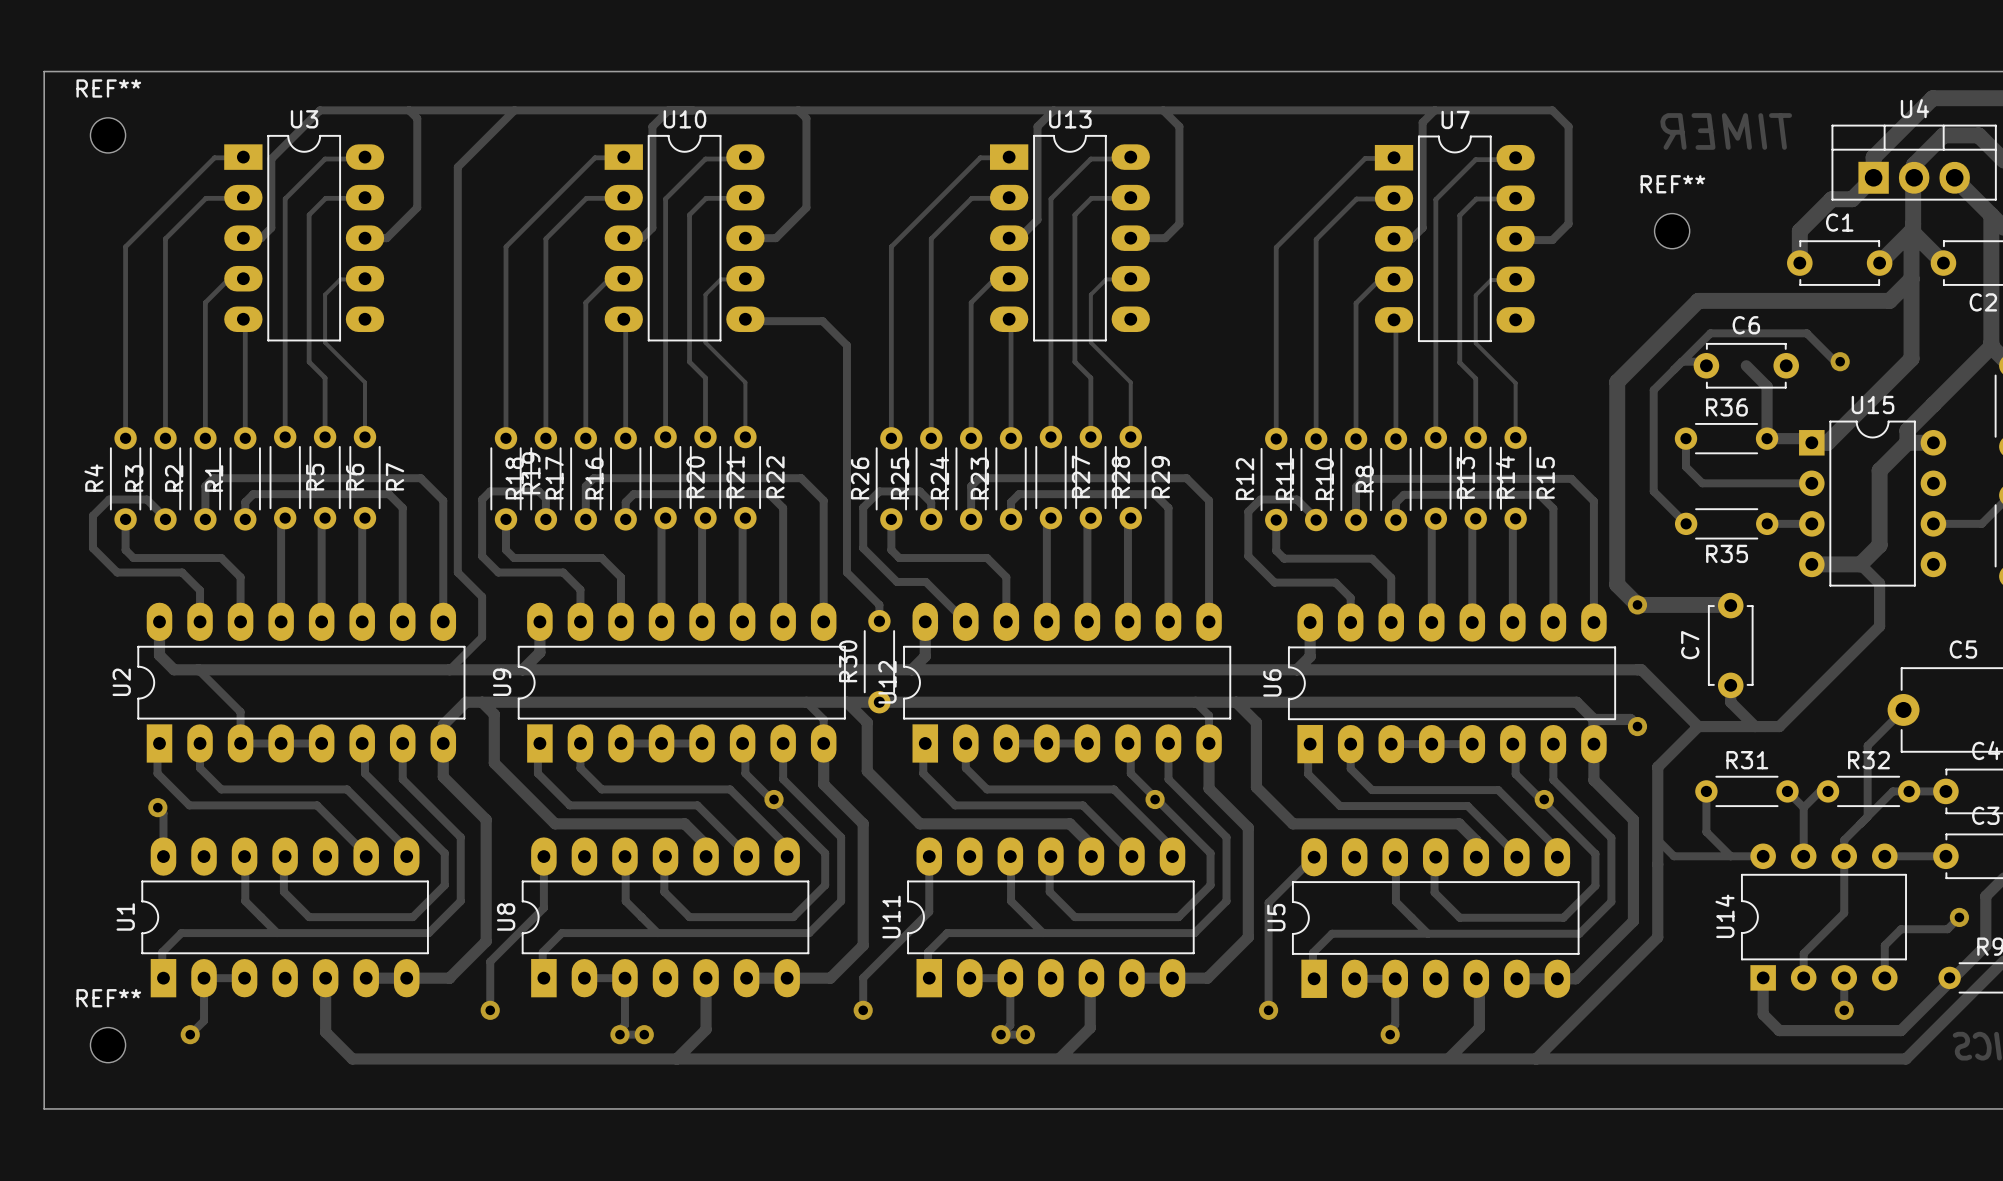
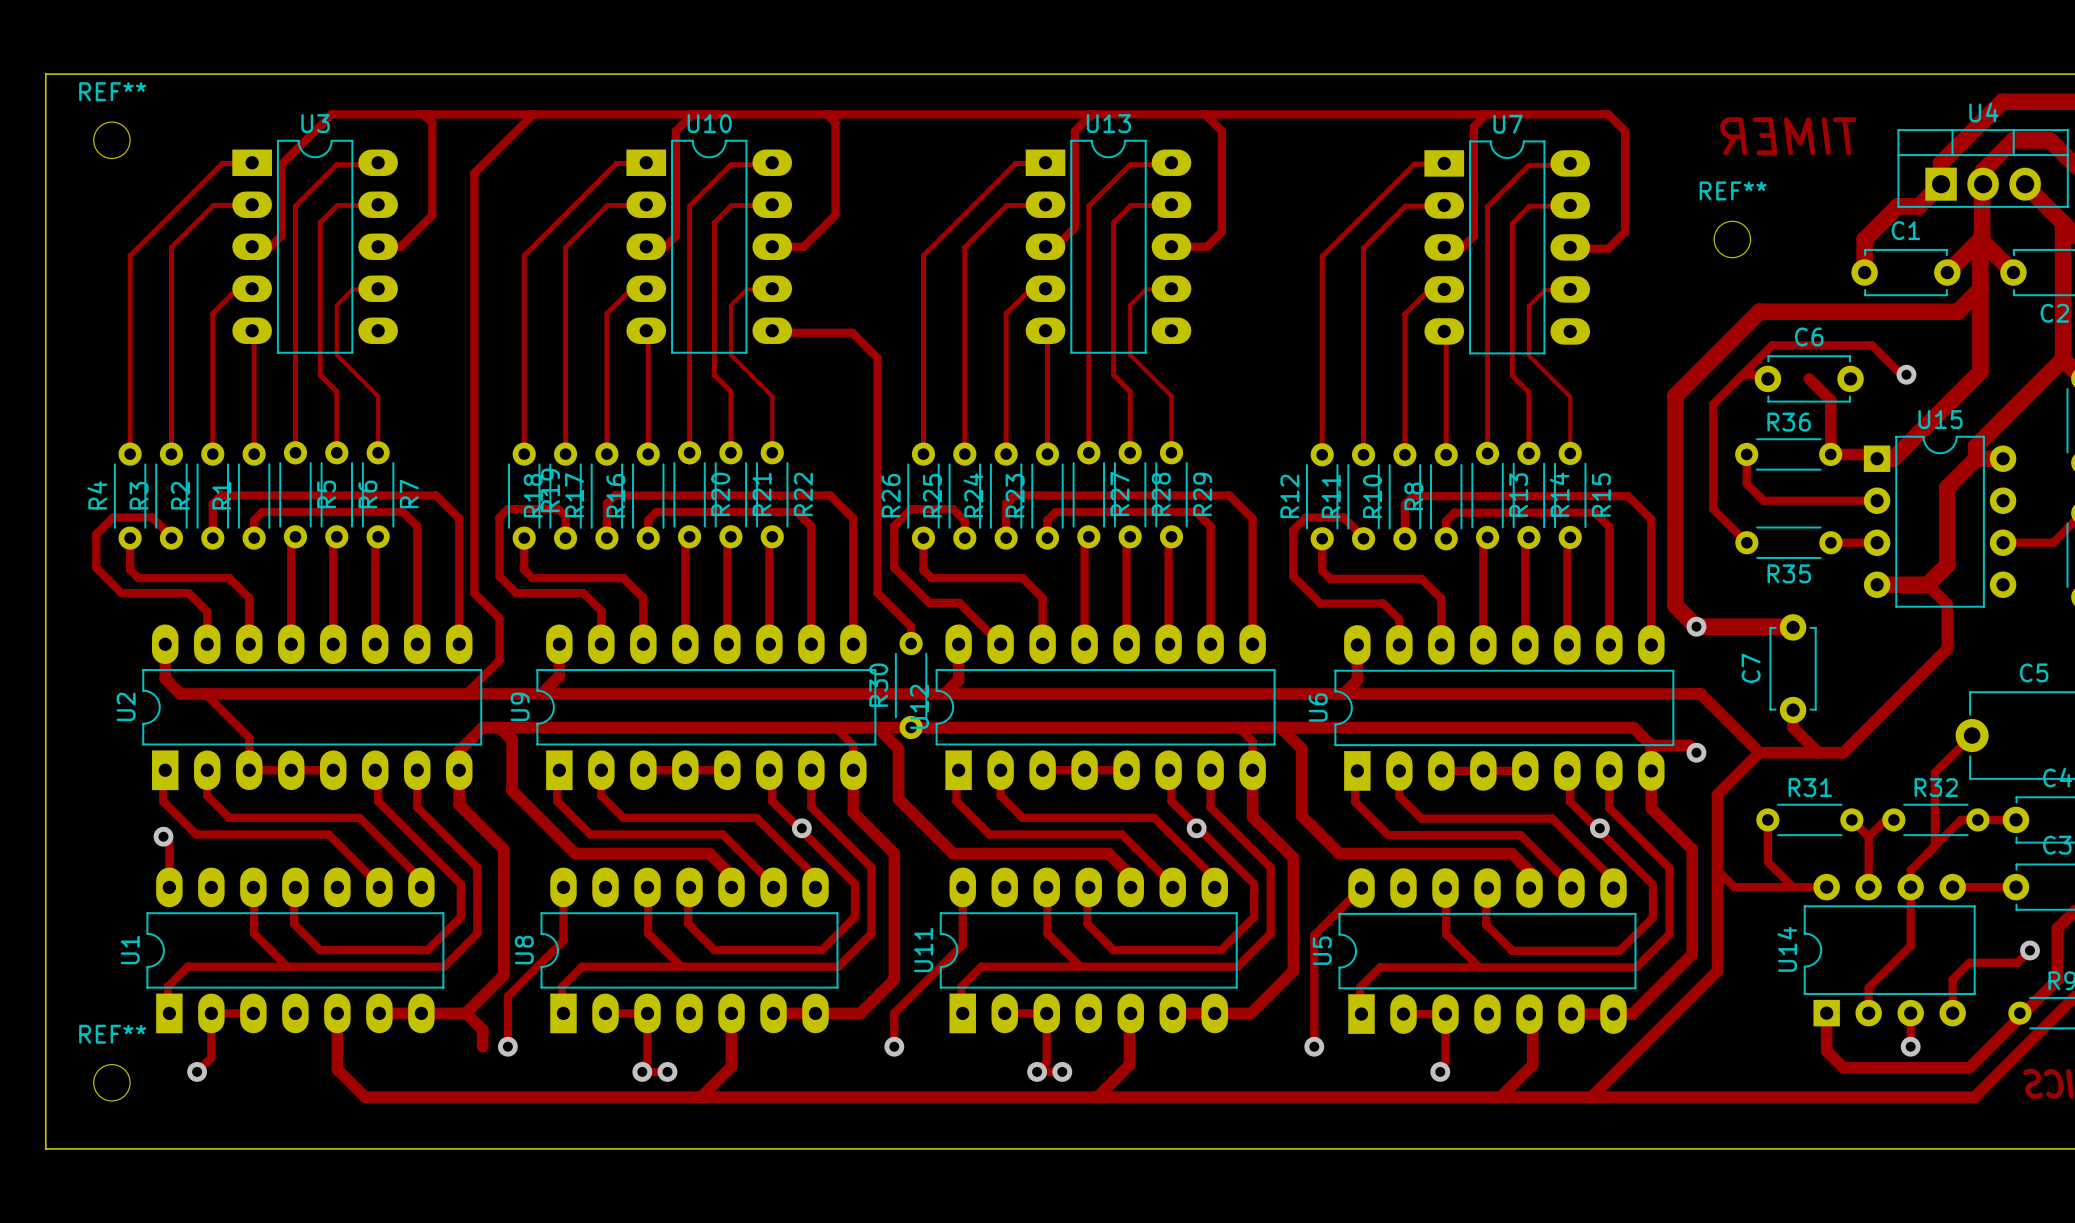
track: none -> (466, 1013) (482, 1029) (482, 1046)

